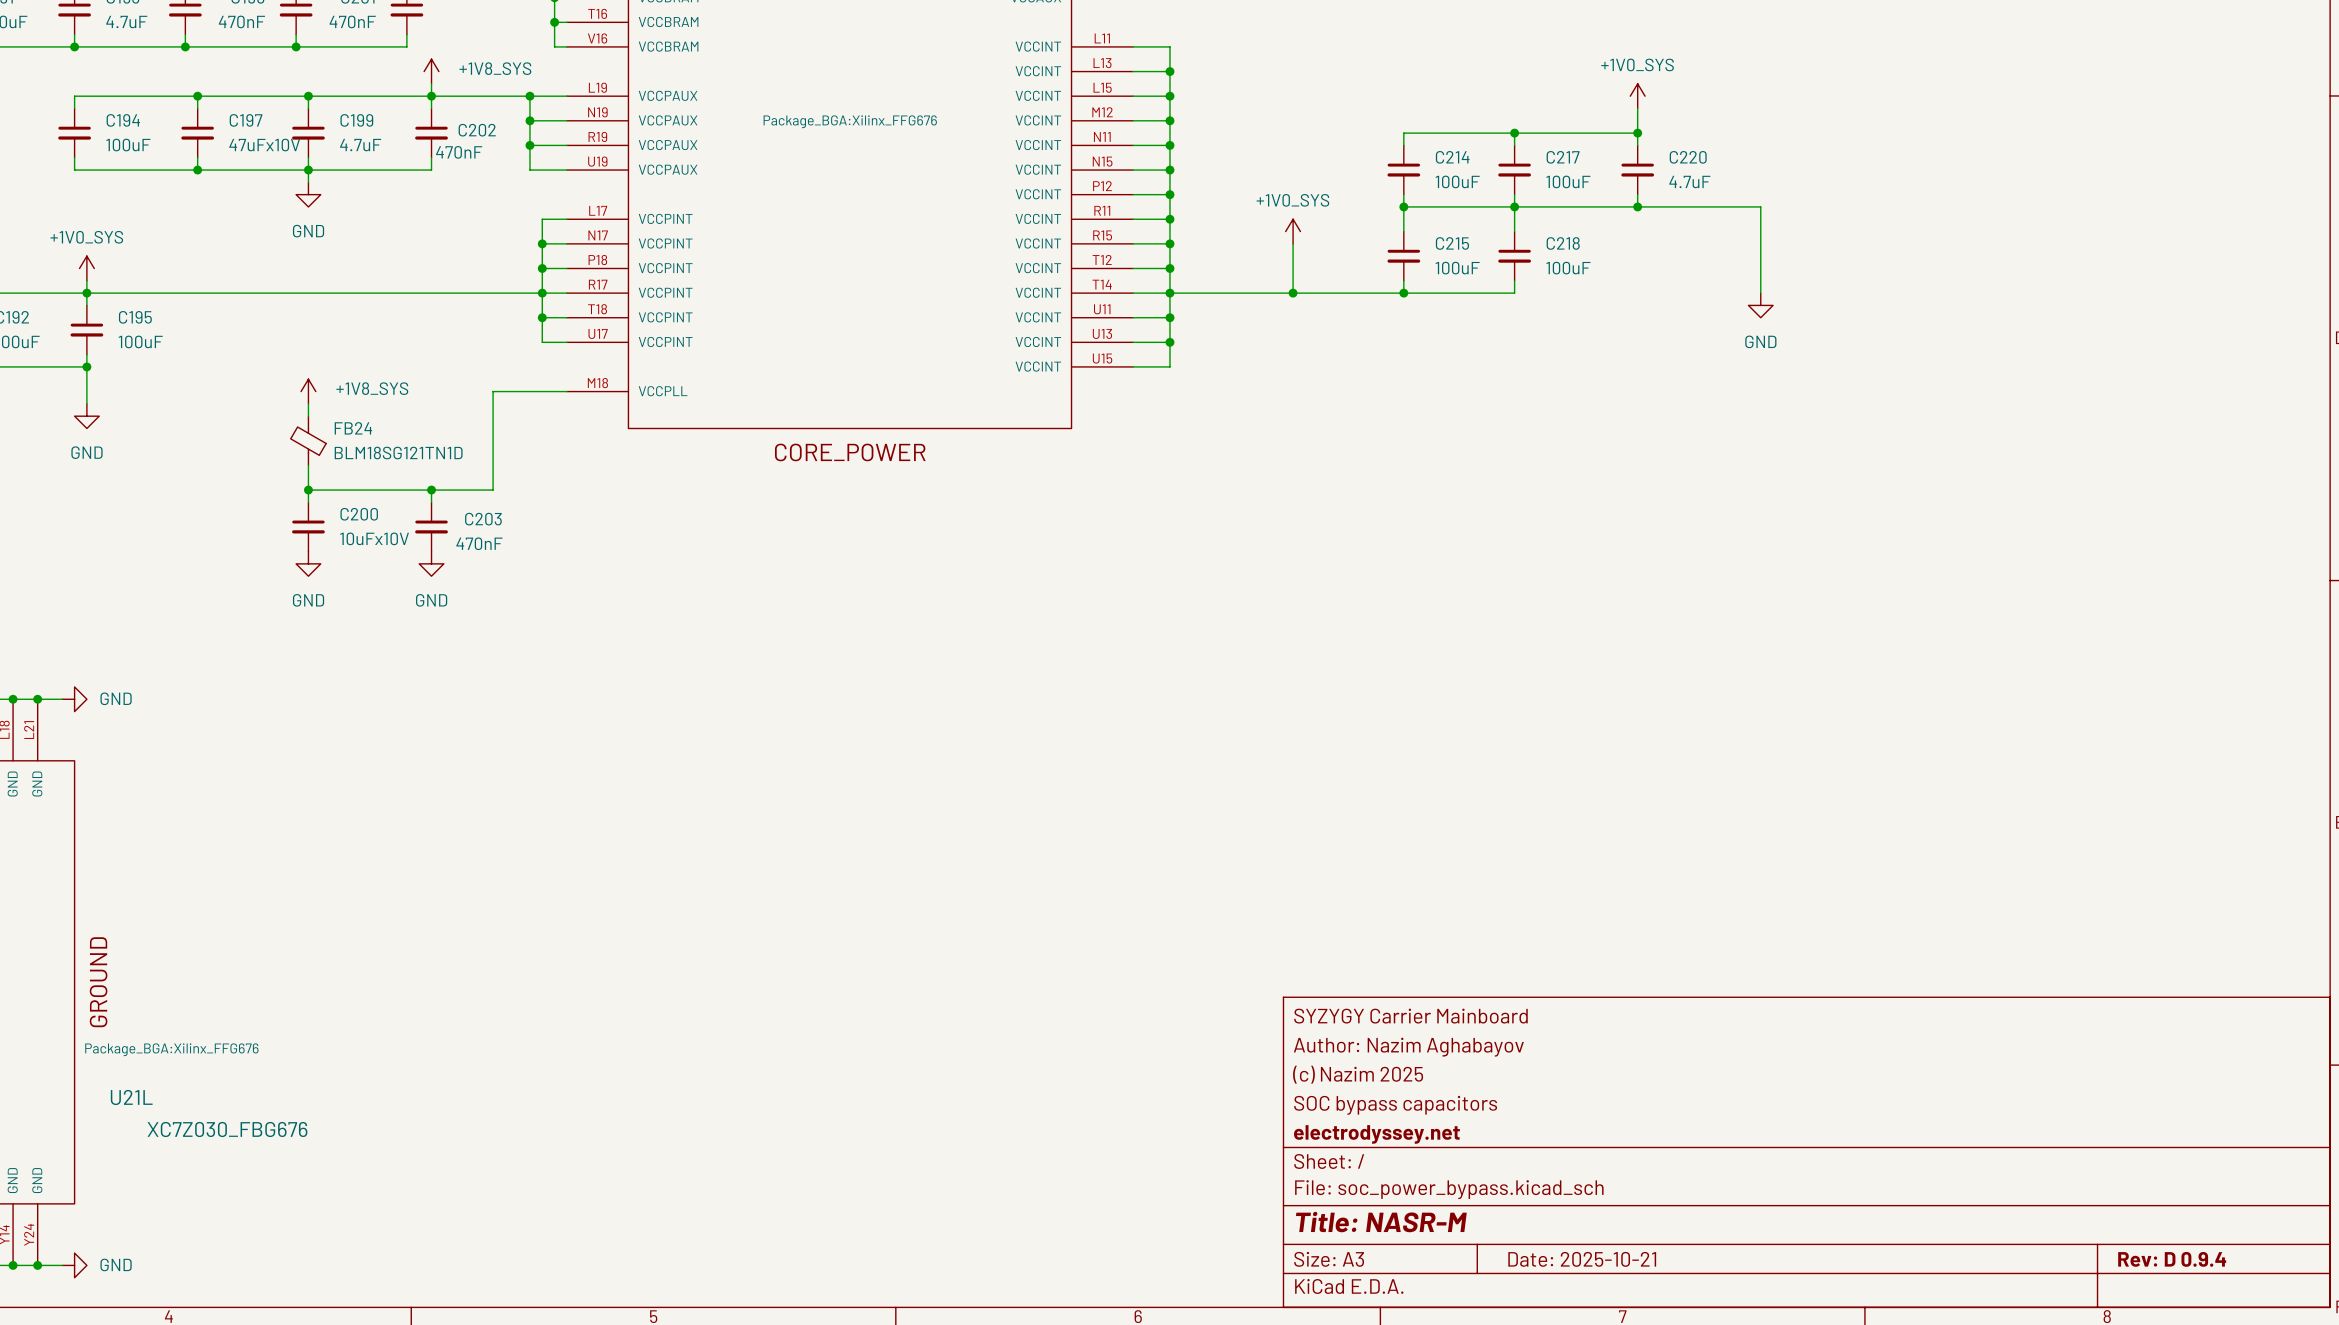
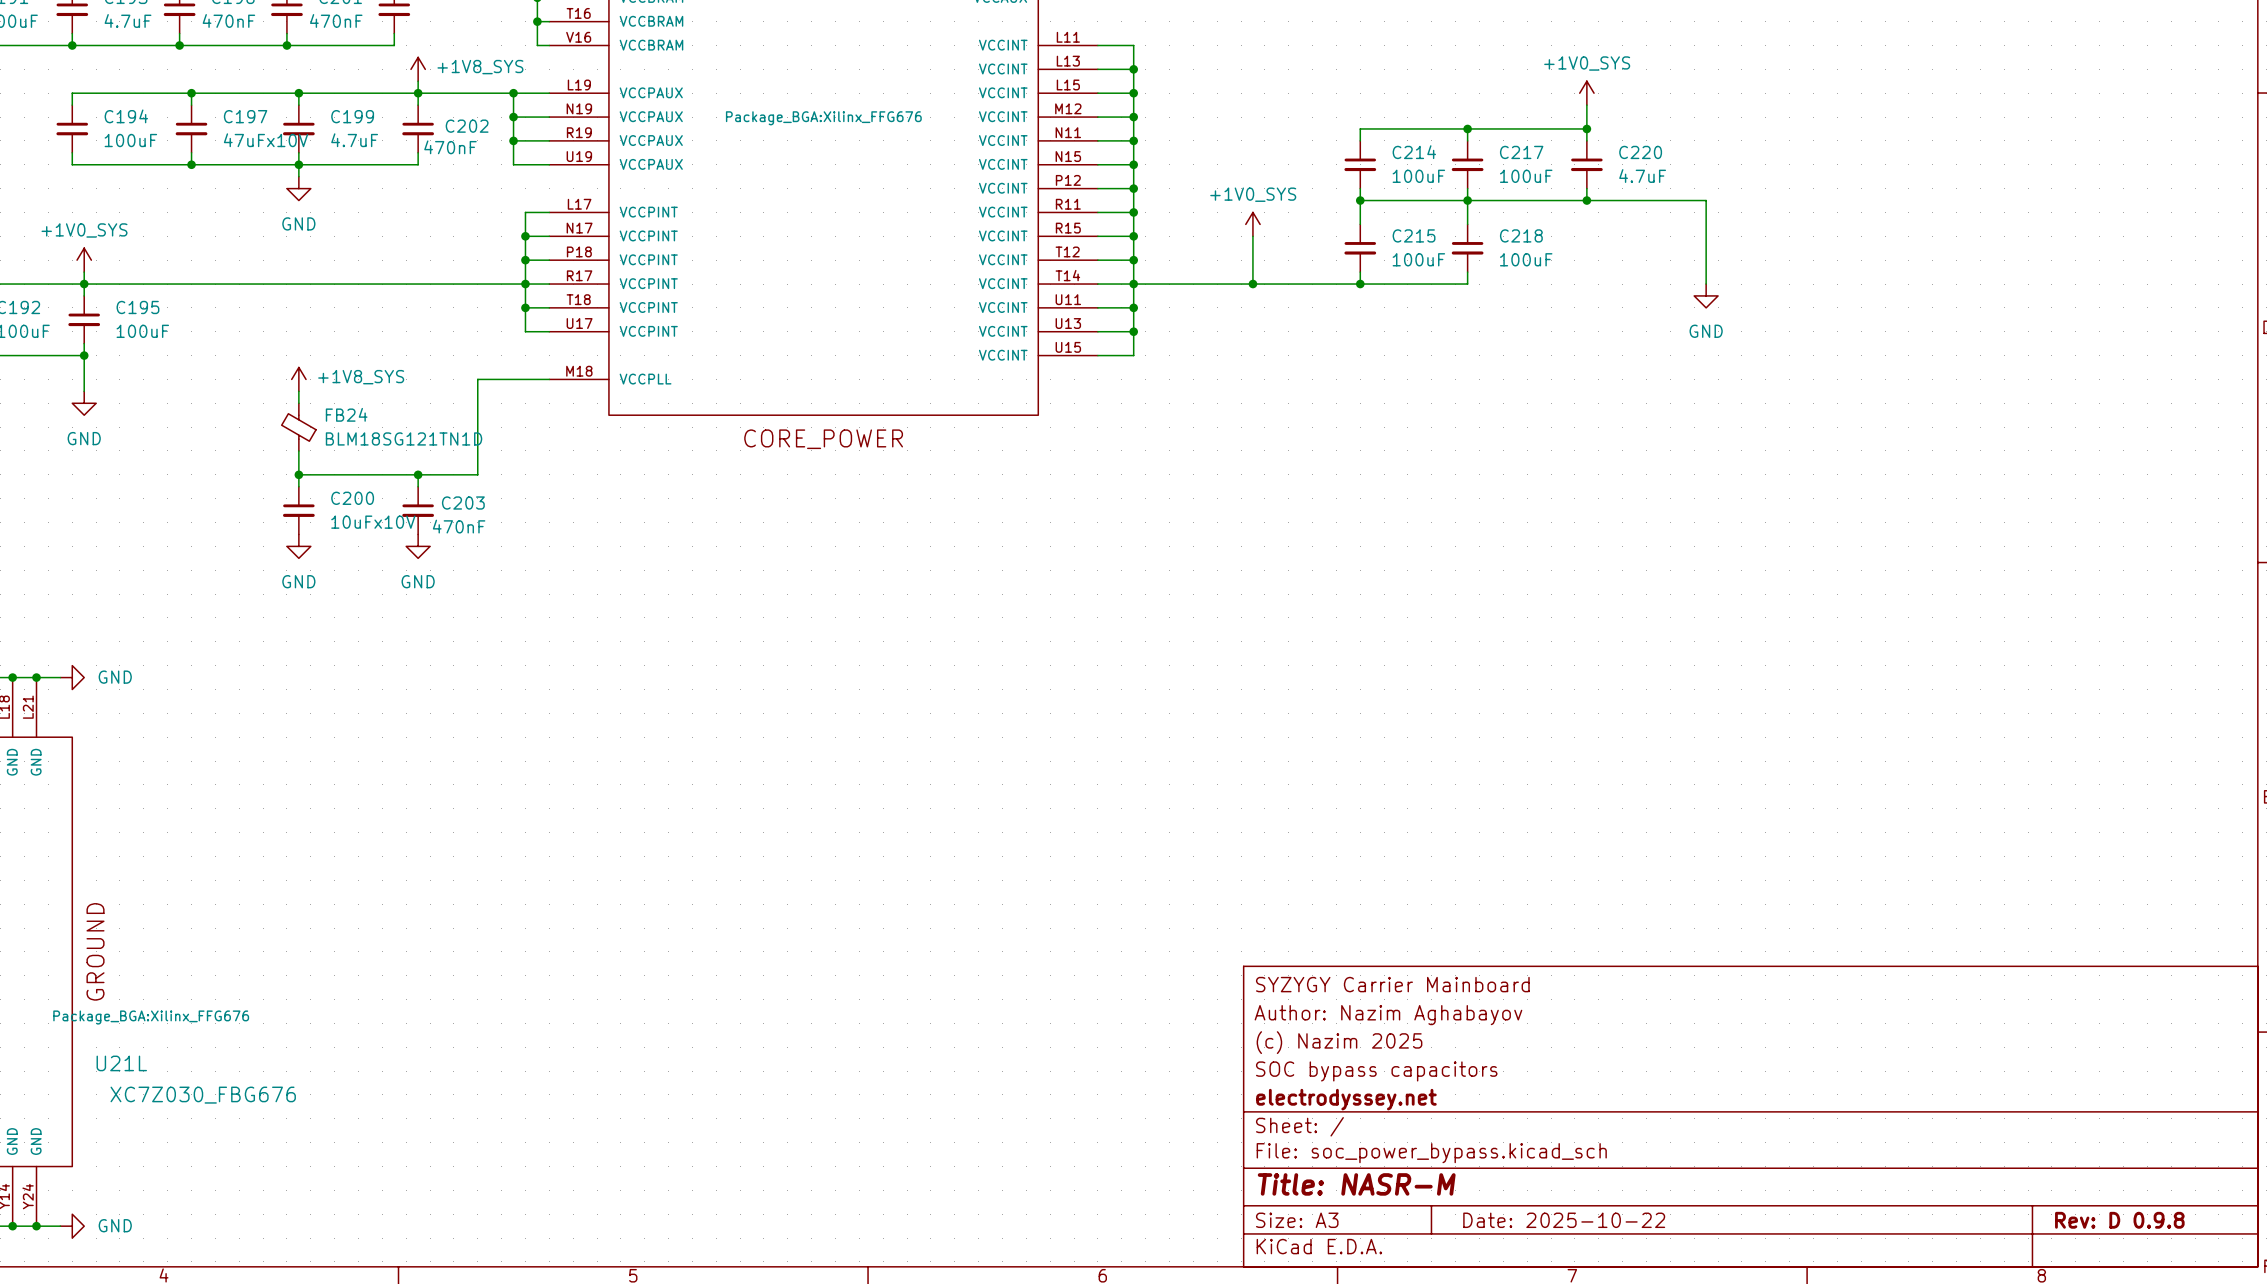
title block: Date: 2025-10-21 (1582, 1259) -> Date: 2025-10-22 (1564, 1220)
title block: Rev: D 0.9.4 (2172, 1259) -> Rev: D 0.9.8 (2119, 1220)

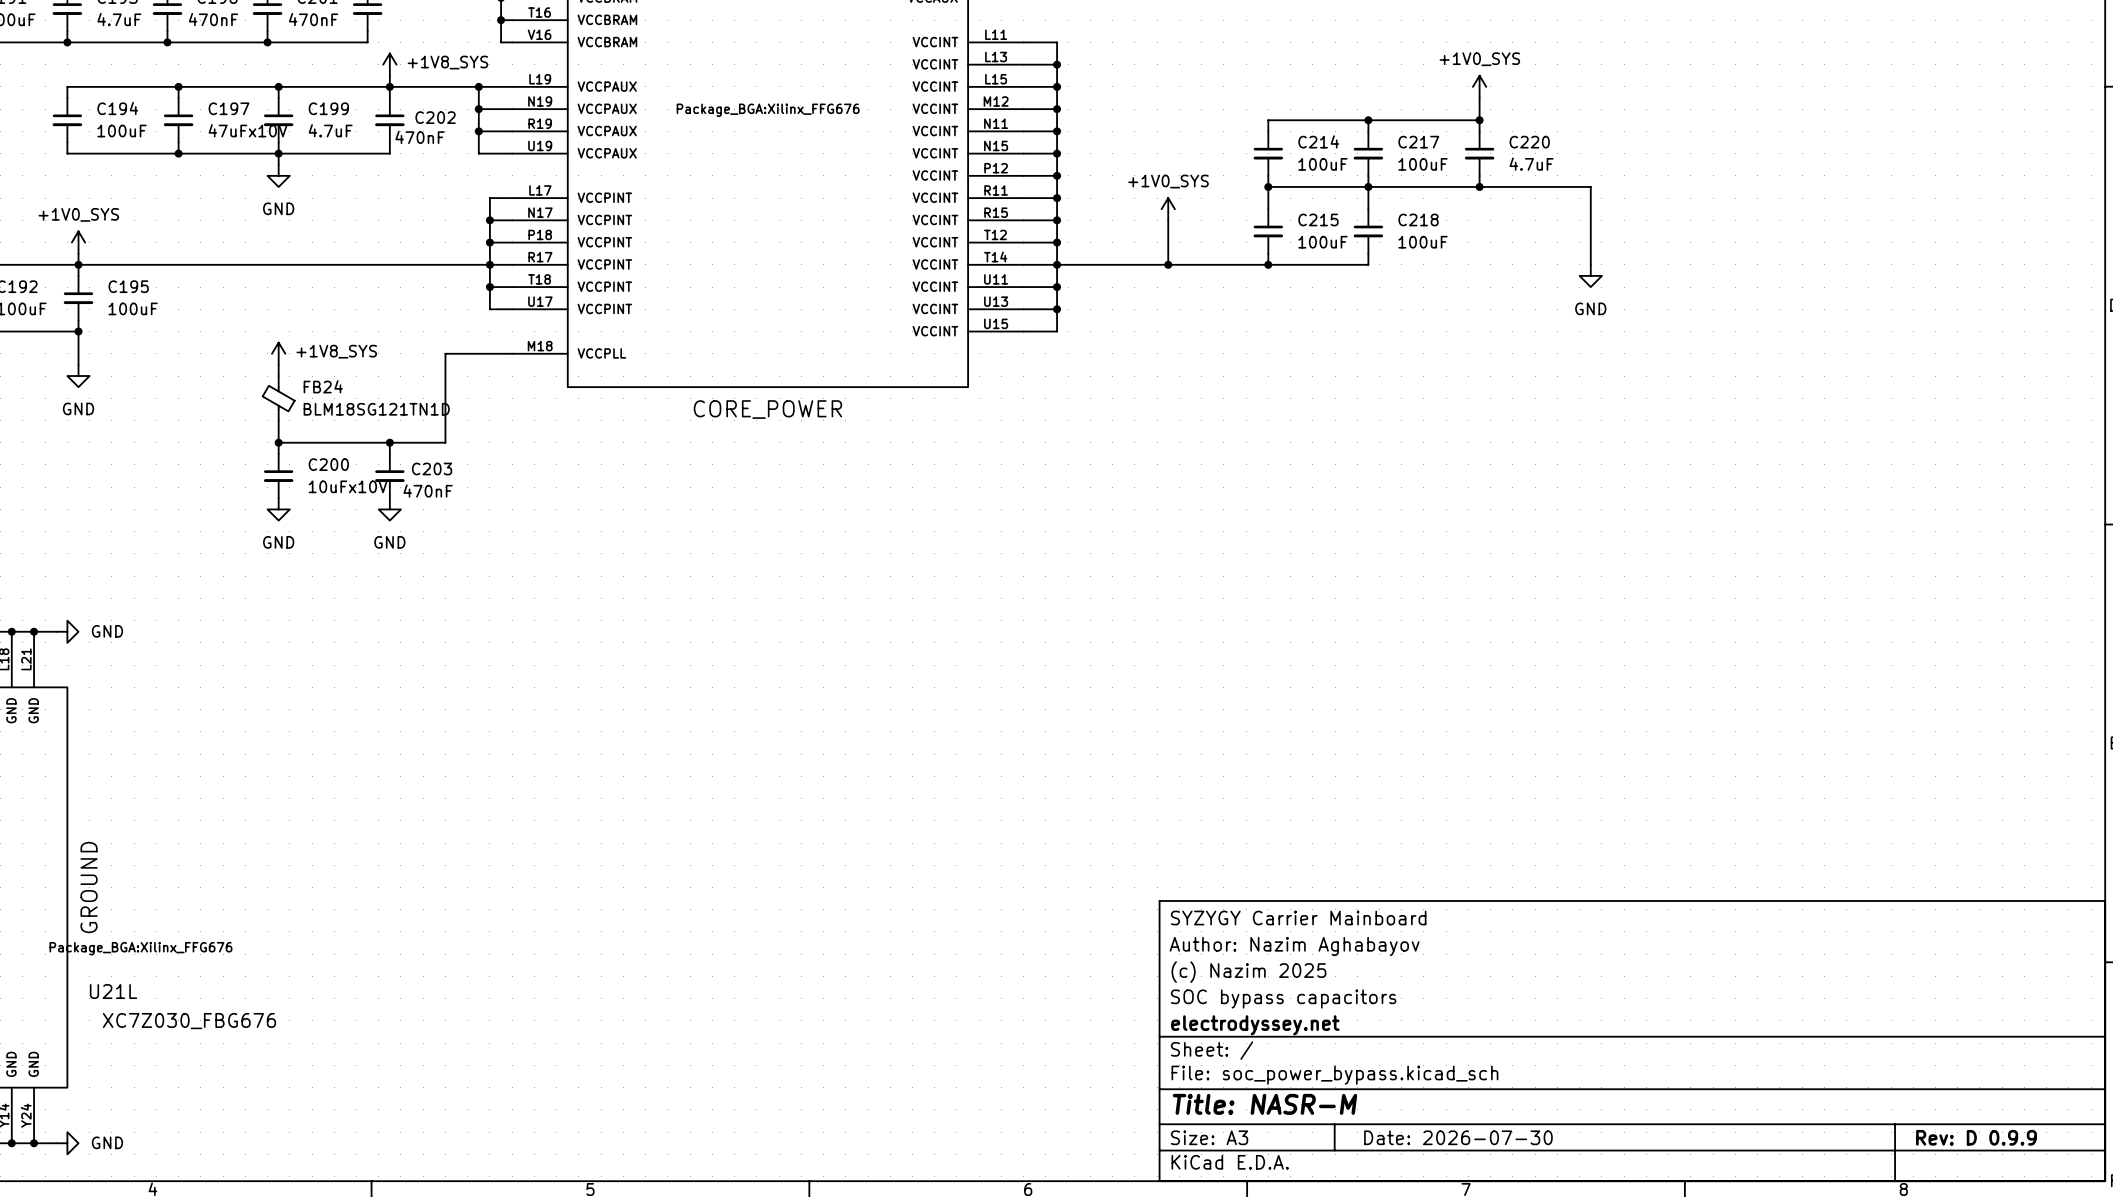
title block: Date: 2025-10-22 (1564, 1220) -> Date: 2026-07-30 (1458, 1137)
title block: Rev: D 0.9.8 (2119, 1220) -> Rev: D 0.9.9 (1976, 1137)

